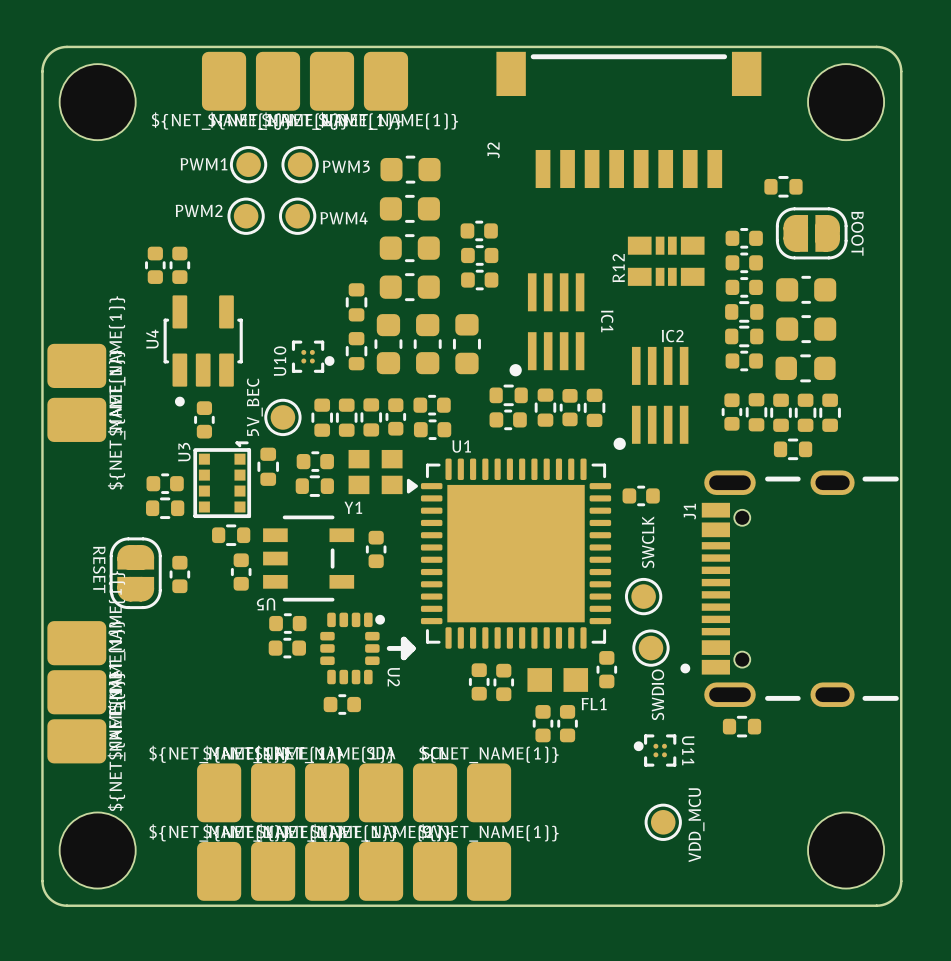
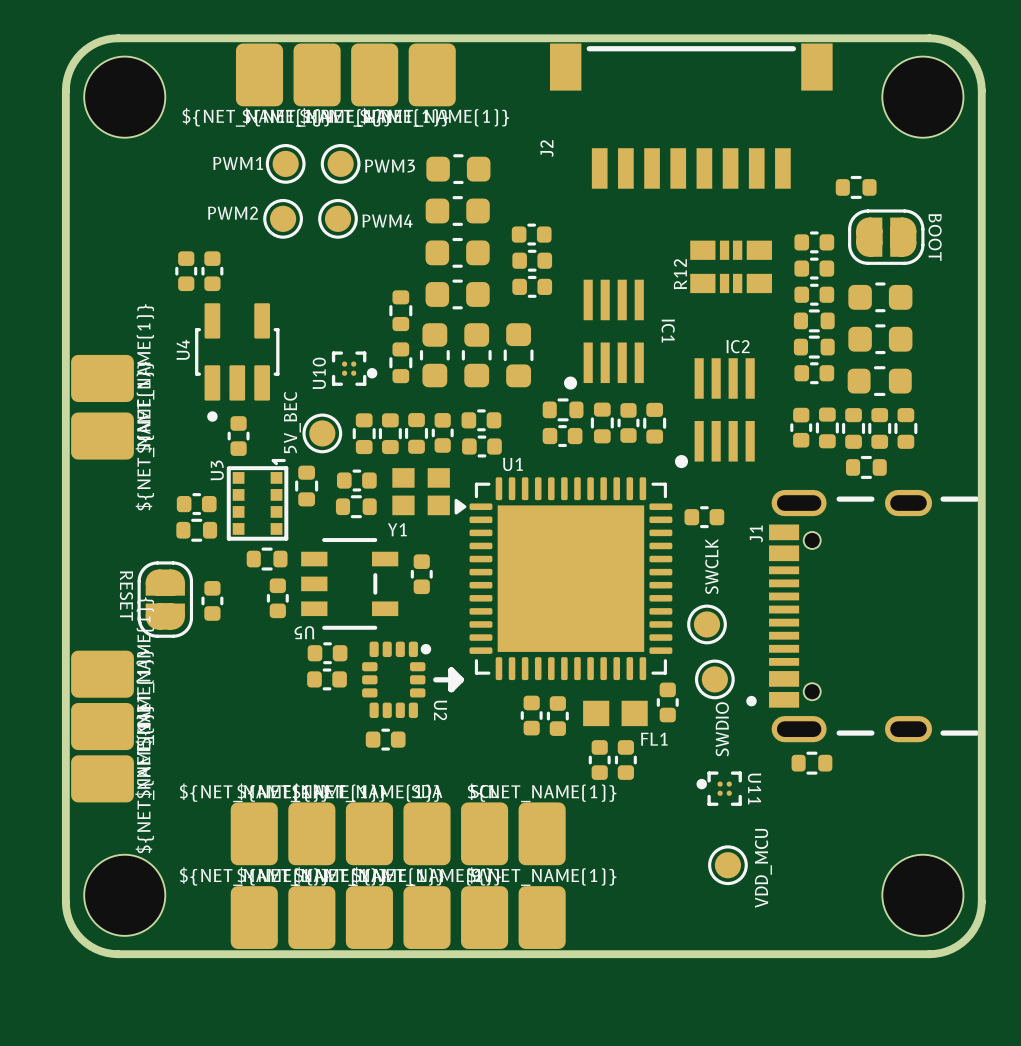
part footprint: [41, 45, 903, 907] -> [61, 34, 986, 959]

